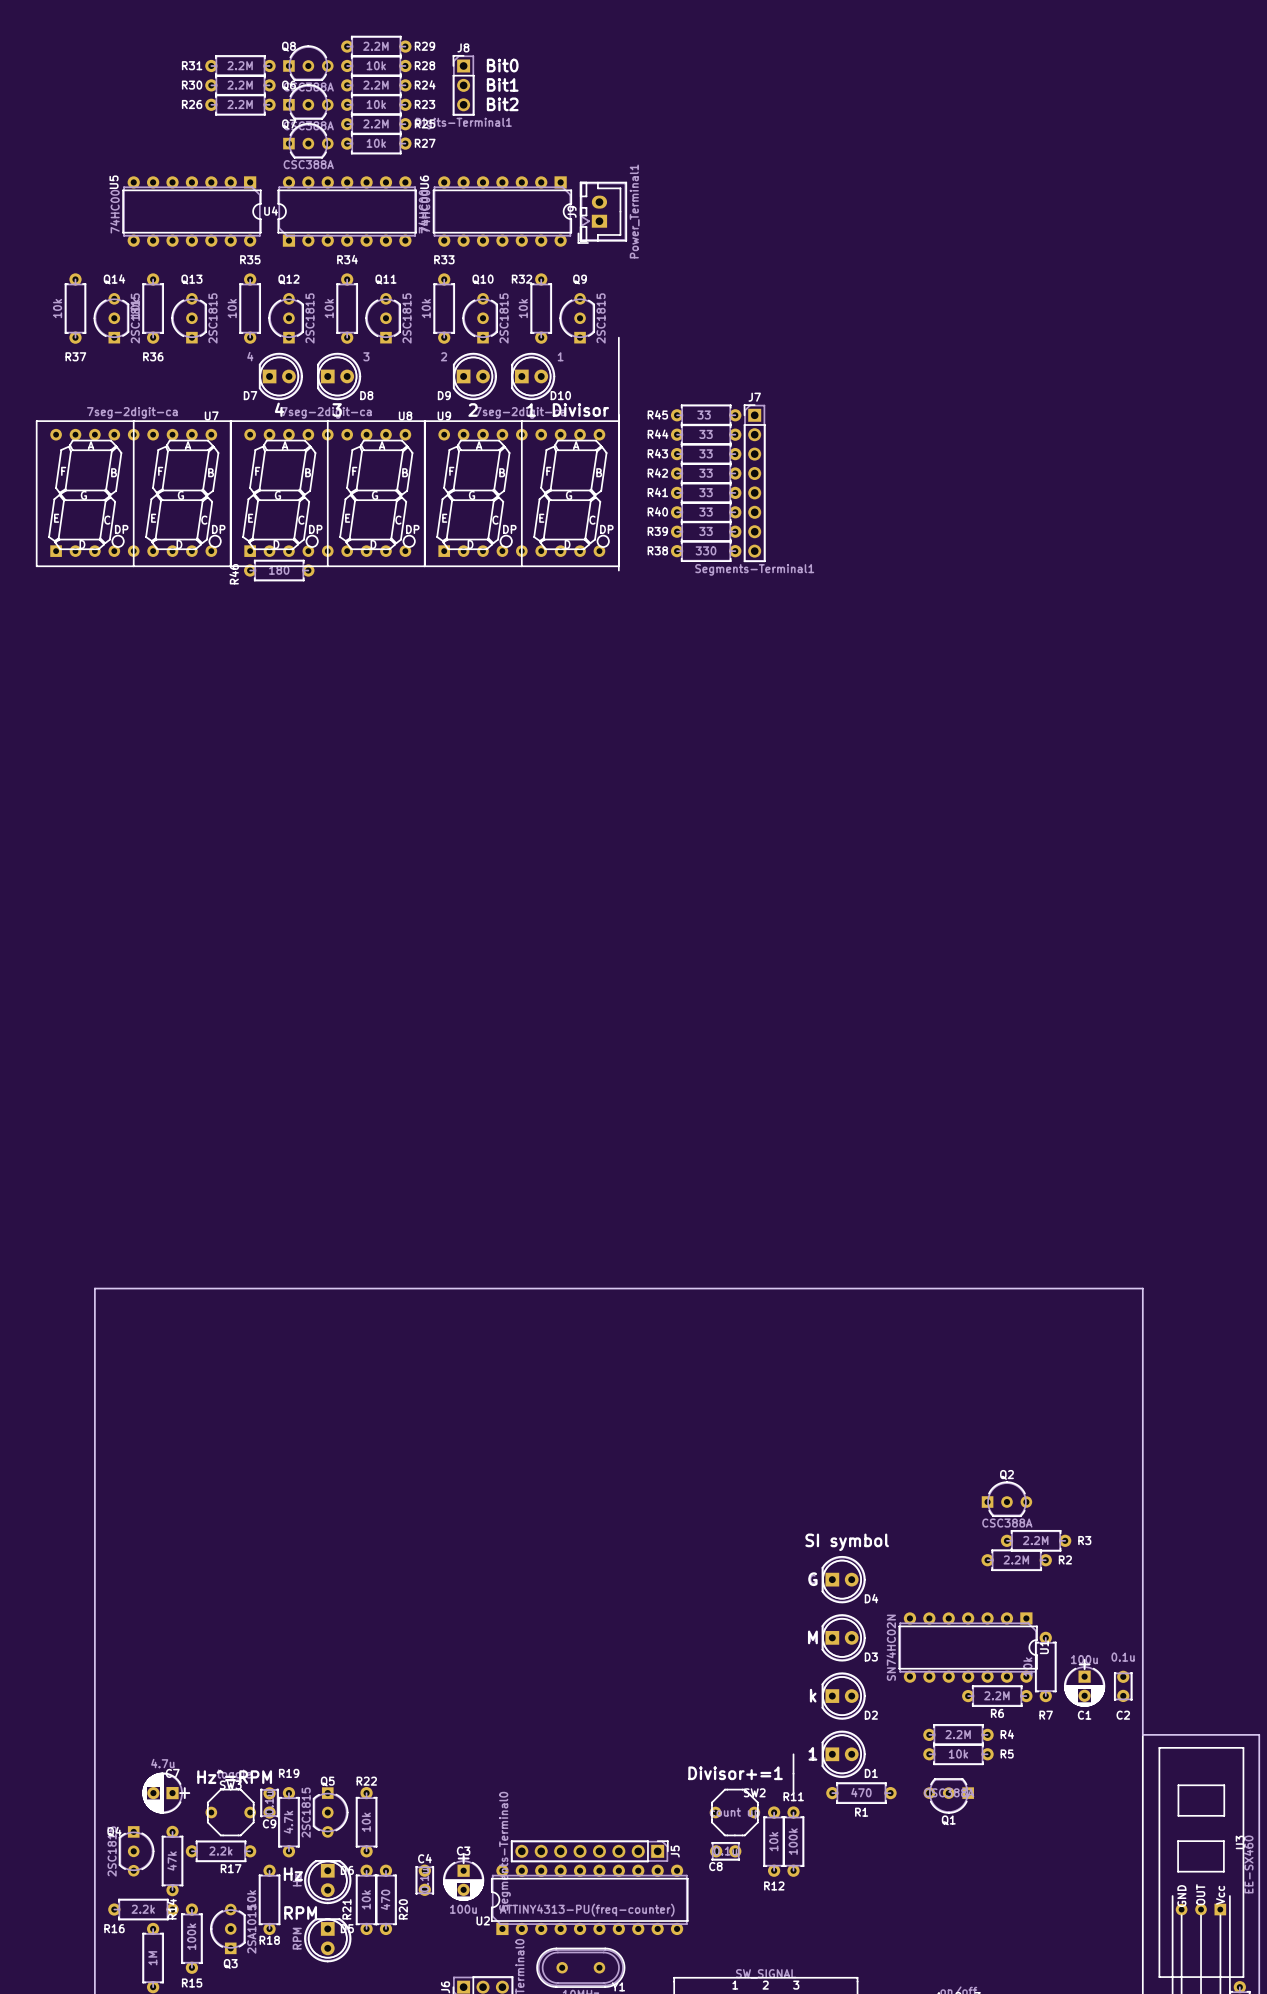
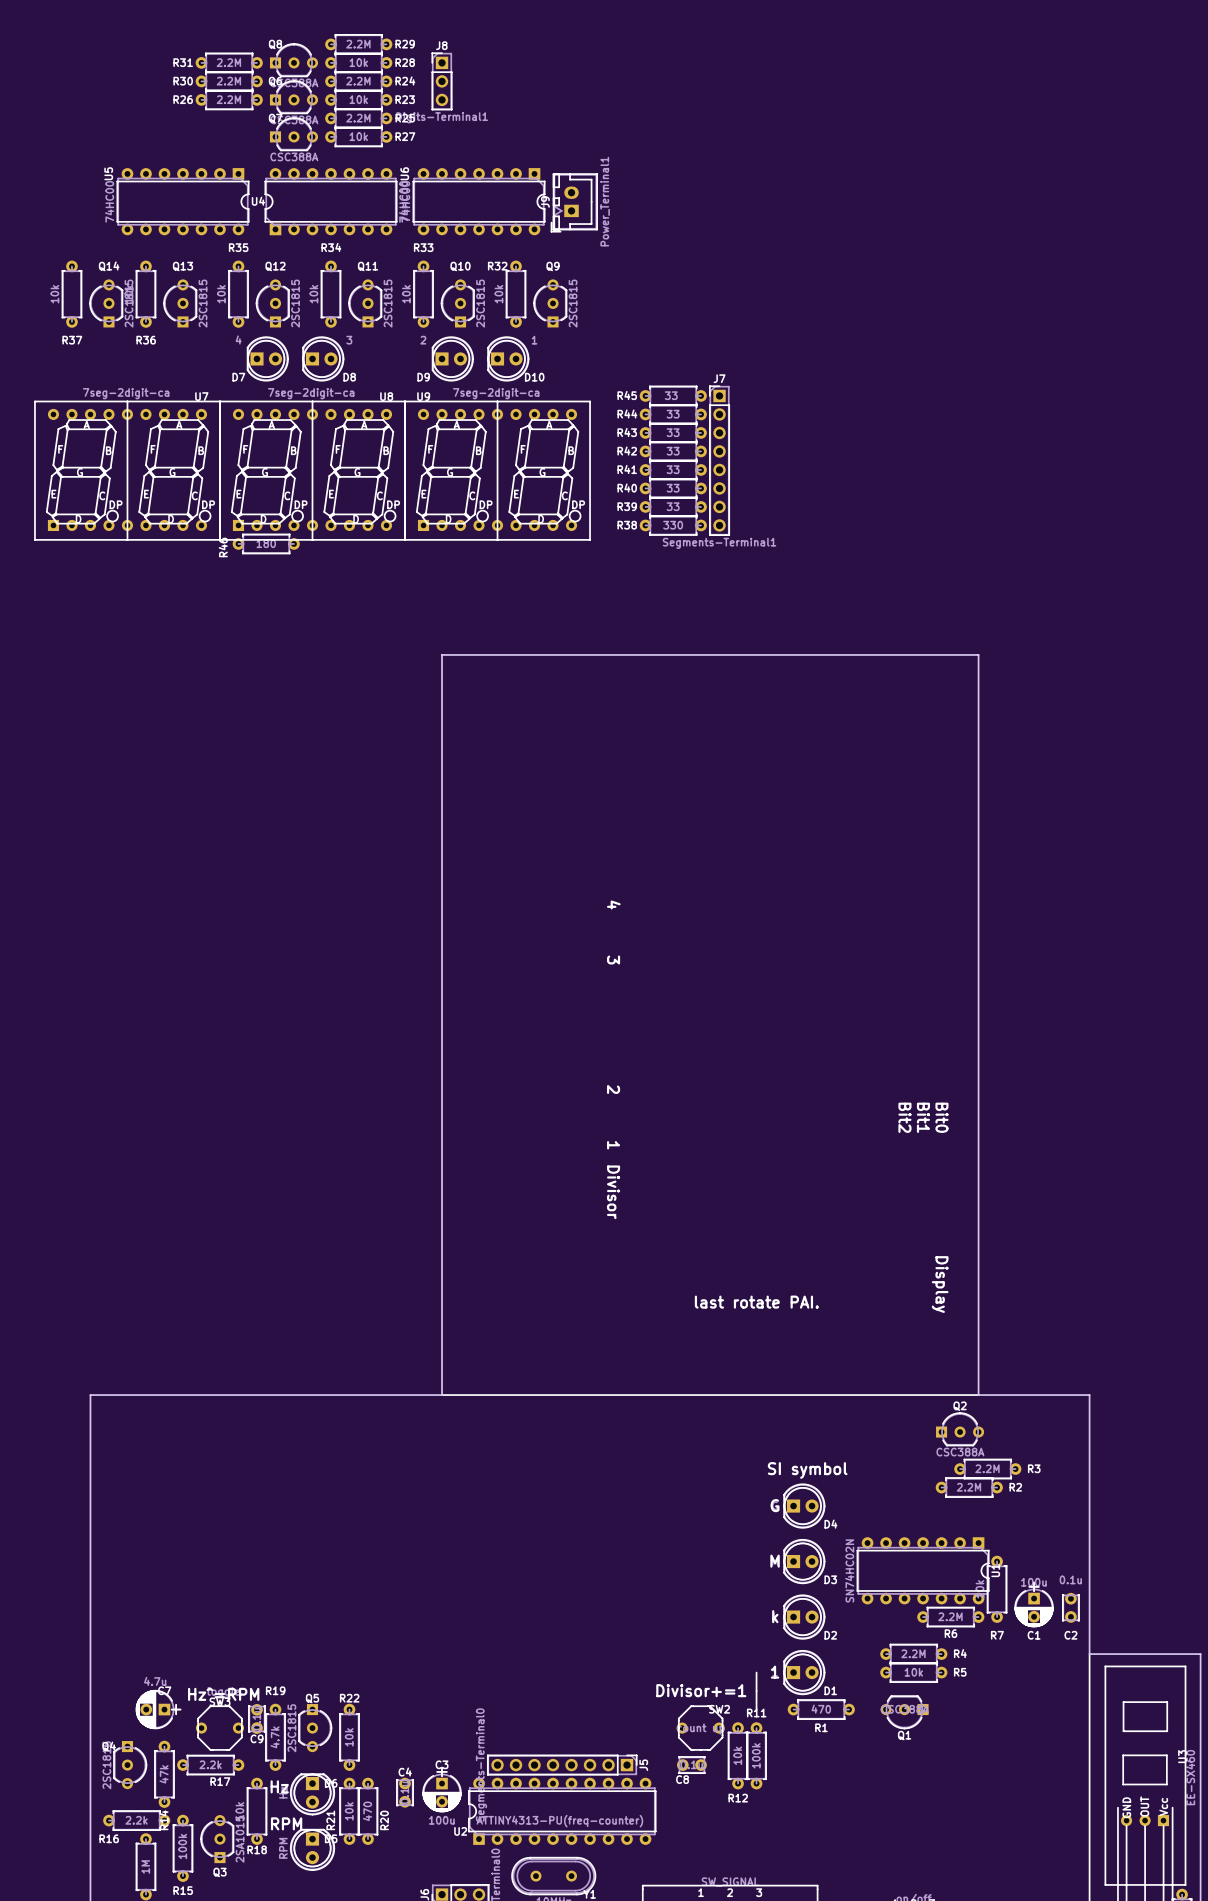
text: Bit0 (502, 65) -> none
text: Bit1 (502, 84) -> none
text: Bit2 (502, 104) -> none
line: (618, 337) (618, 570) -> none
text: 4 (279, 409) -> none
text: 3 (337, 410) -> none
text: 2 (473, 410) -> none
text: 1 (531, 410) -> none
text: Divisor (580, 410) -> none
text: none -> 4 (613, 905)
text: none -> 3 (613, 959)
text: none -> 2 (613, 1089)
text: none -> Bit2 (904, 1117)
text: none -> Bit1 (923, 1117)
text: none -> Bit0 (941, 1117)
text: none -> 1 (613, 1145)
text: none -> Divisor (613, 1192)
text: none -> Display (940, 1284)
text: none -> last rotate PAI. (756, 1302)
board edge: (94, 1463) (94, 1288) (1142, 1288) (1142, 1463) -> (90, 1395) (442, 1395) (442, 654) (978, 654) (978, 1395) (1089, 1395)
line: none -> (442, 1395) (978, 1395)

